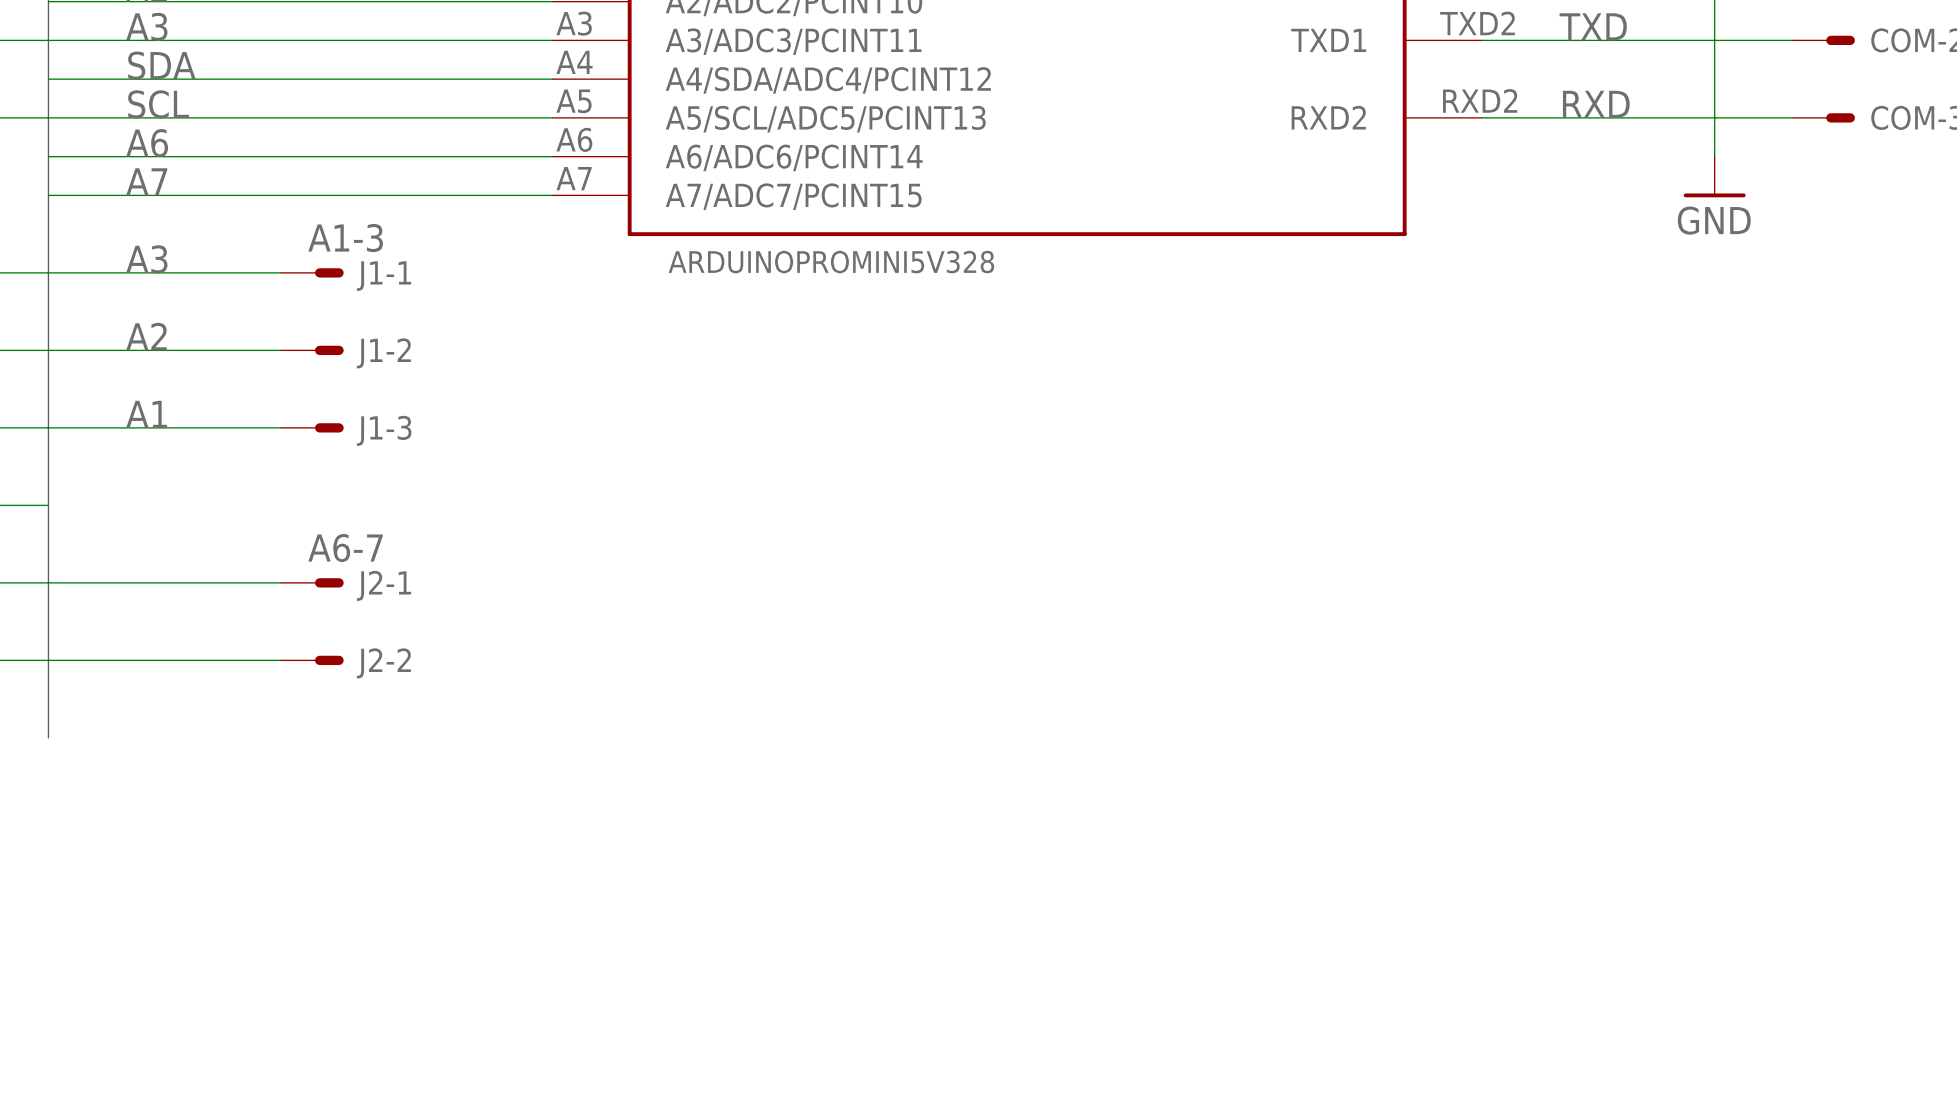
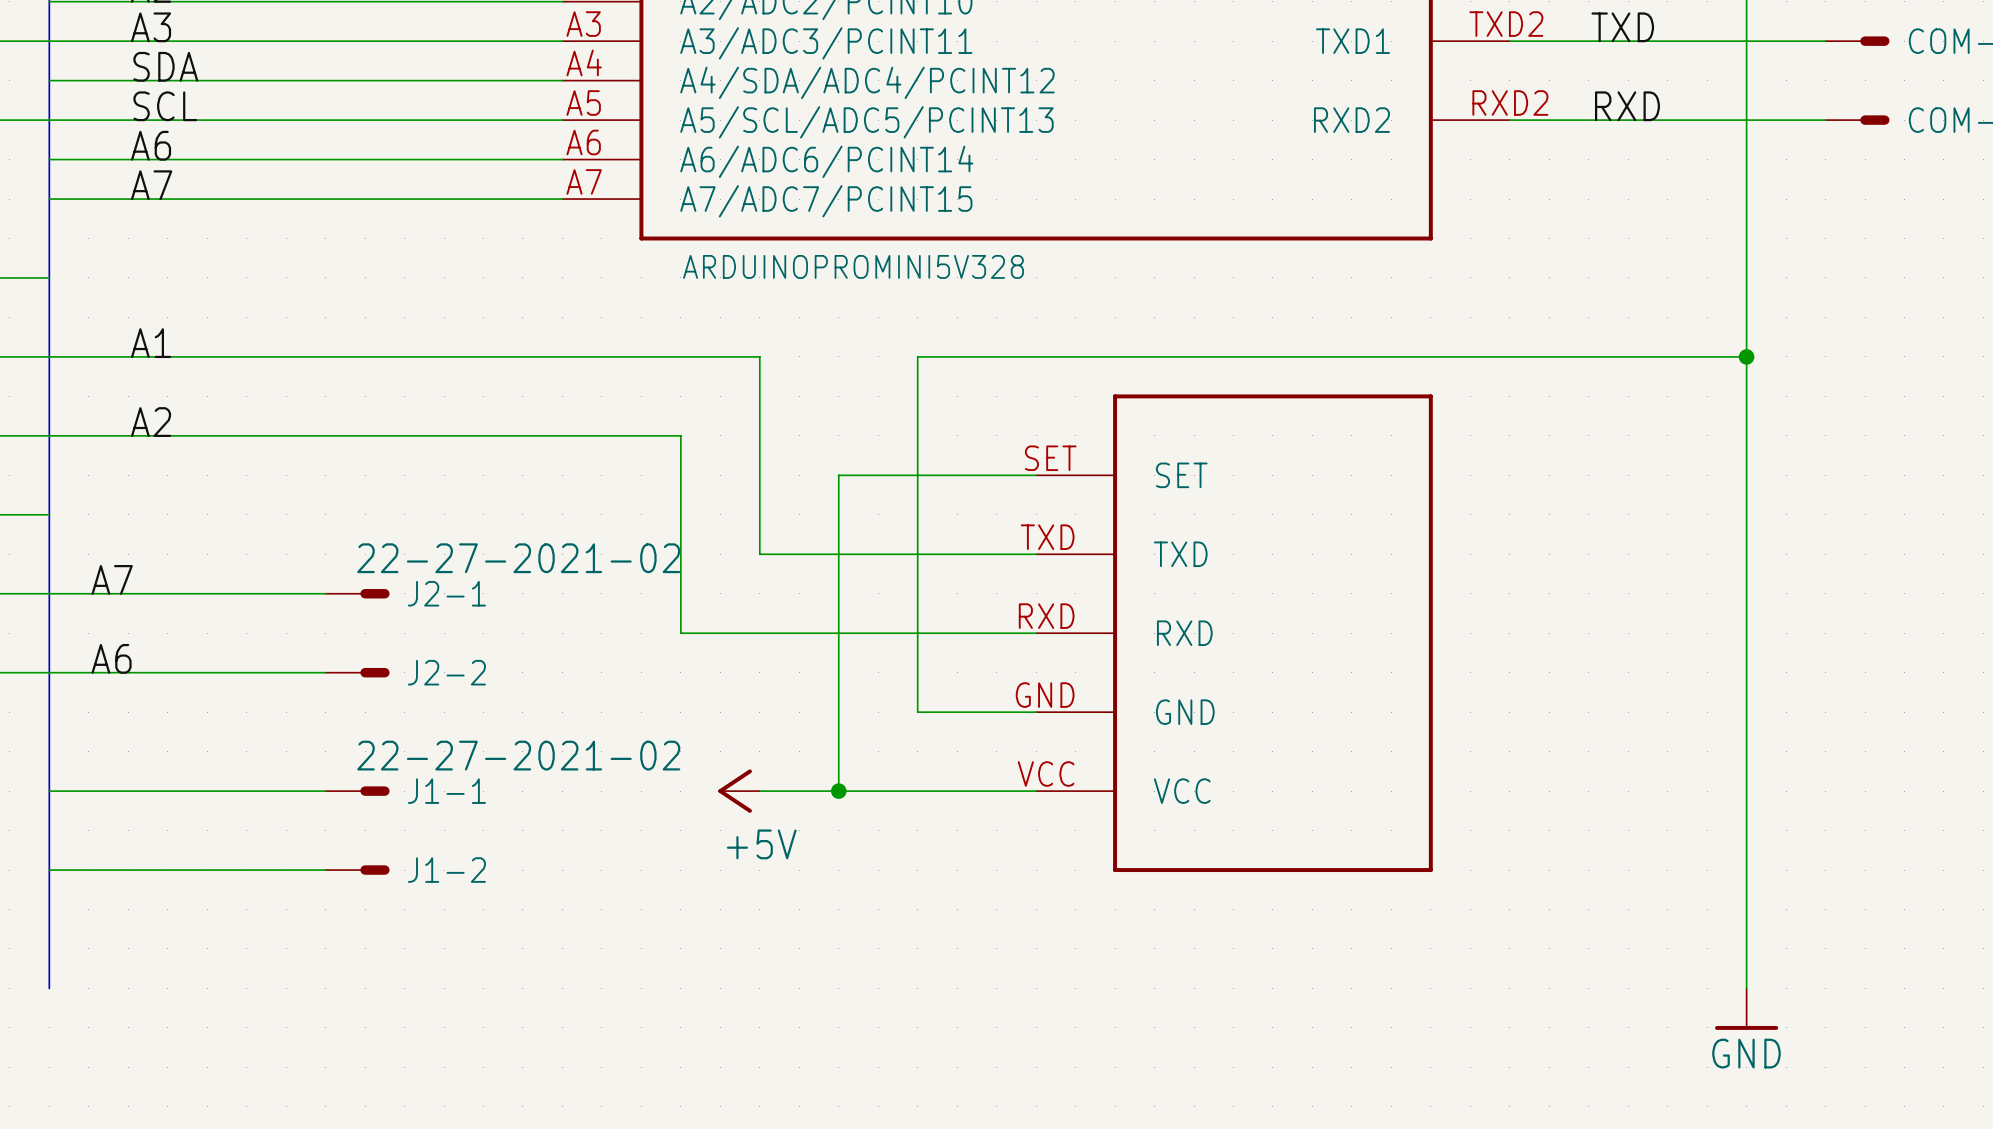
wire: none -> (1746, 159) (1746, 988)
power symbol: GND (1714, 176) -> none
J1-1 value: А1-3 (345, 238) -> 22-27-2021-02 (518, 755)
label: A3 (146, 259) -> none
wire: (48, 272) (280, 272) -> none
J1-1 position: (312, 272) -> (357, 791)
label: A2 (146, 336) -> A1 (151, 343)
wire: none -> (286, 356) (759, 356) (759, 554) (1036, 554)
J1-2 position: (312, 350) -> (357, 870)
wire: none -> (1746, 356) (917, 356) (917, 712) (1036, 712)
junction: none -> (1746, 356)
label: A1 (146, 414) -> A2 (151, 422)
wire: none -> (286, 435) (680, 435) (680, 633) (1036, 633)
J1-3: (312, 427) -> none
wire: none -> (1036, 475) (838, 475) (838, 791)
J2-1 value: А6-7 (345, 548) -> 22-27-2021-02 (518, 558)
label: none -> A7 (112, 579)
J2-1 position: (312, 582) -> (357, 593)
part: none -> (1234, 633)
label: none -> A6 (111, 658)
J2-2 position: (312, 660) -> (357, 672)
bus: none -> (49, 751) (49, 988)
wire: none -> (49, 791) (325, 791)
power symbol: none -> +5V (739, 791)
wire: none -> (759, 791) (1036, 791)
junction: none -> (838, 791)
wire: none -> (49, 870) (325, 870)
power symbol: none -> GND (1746, 1009)

